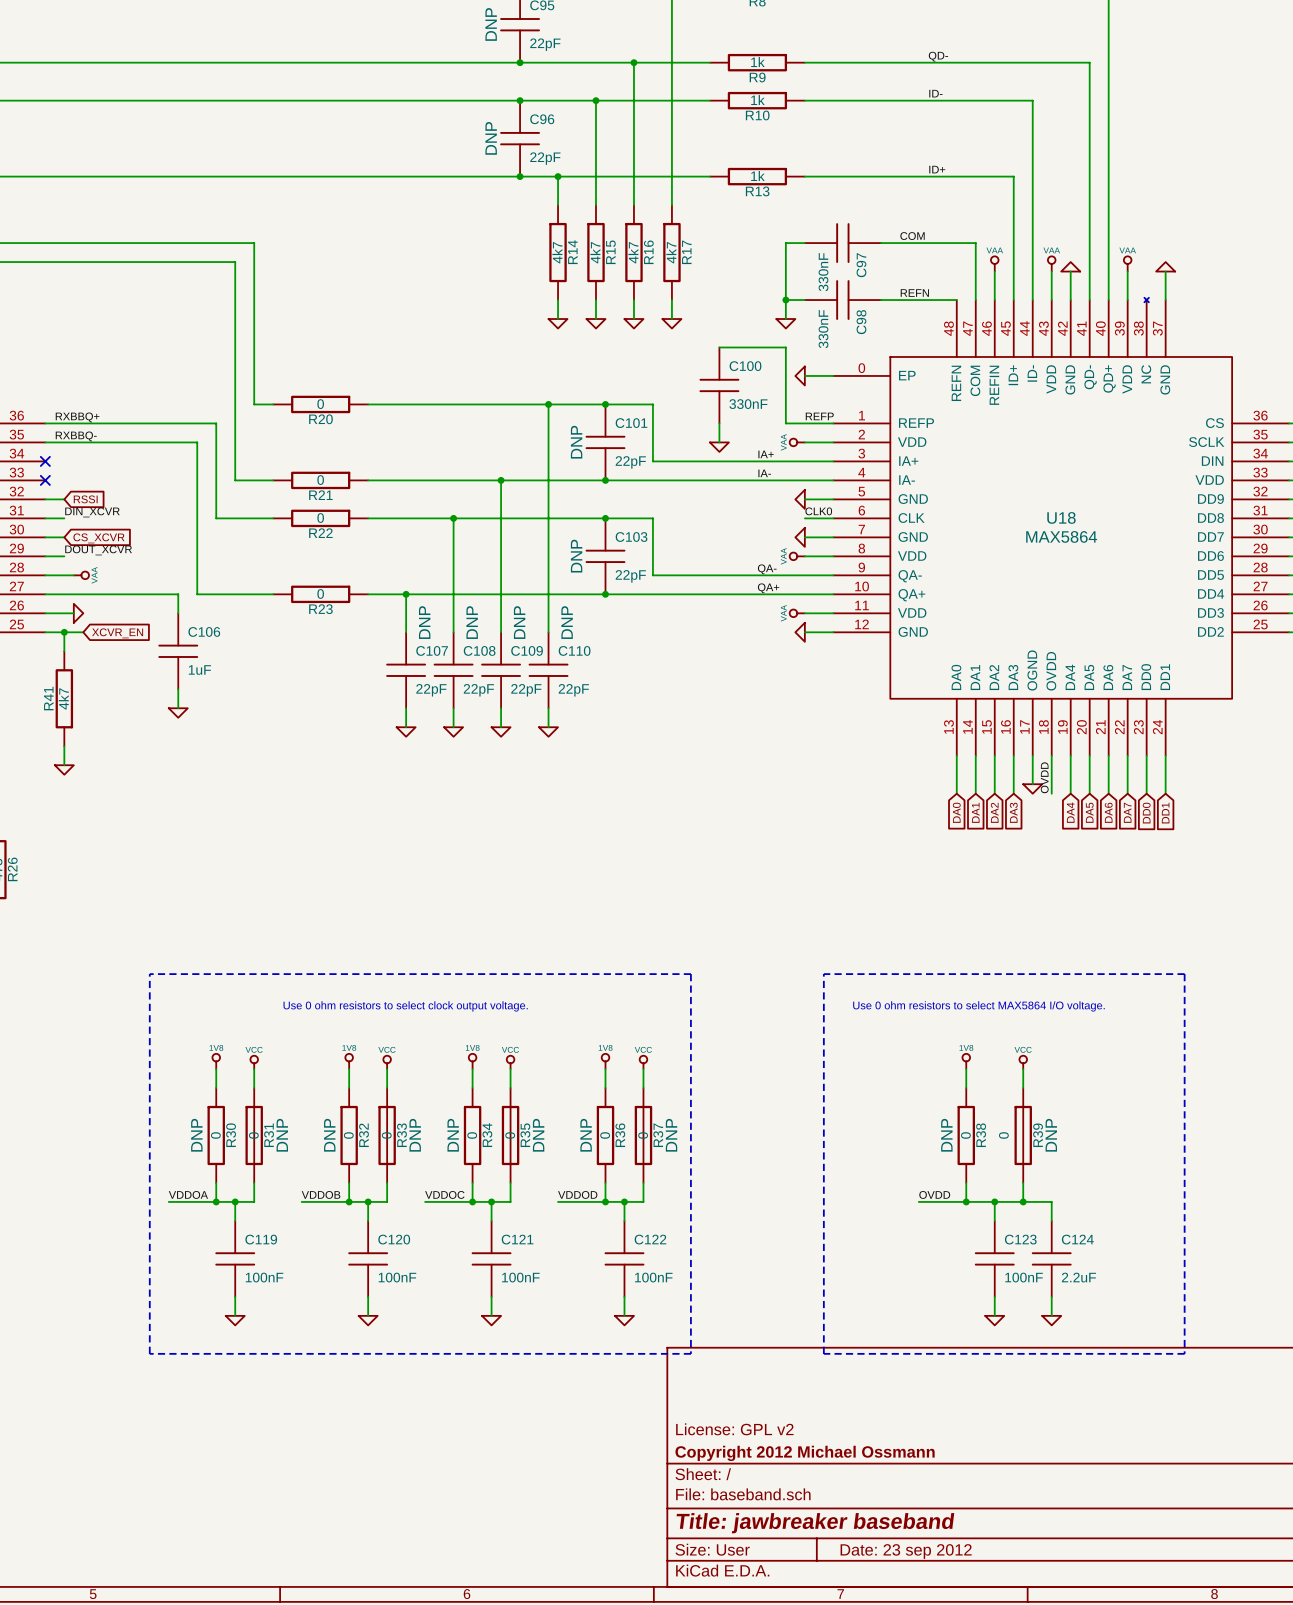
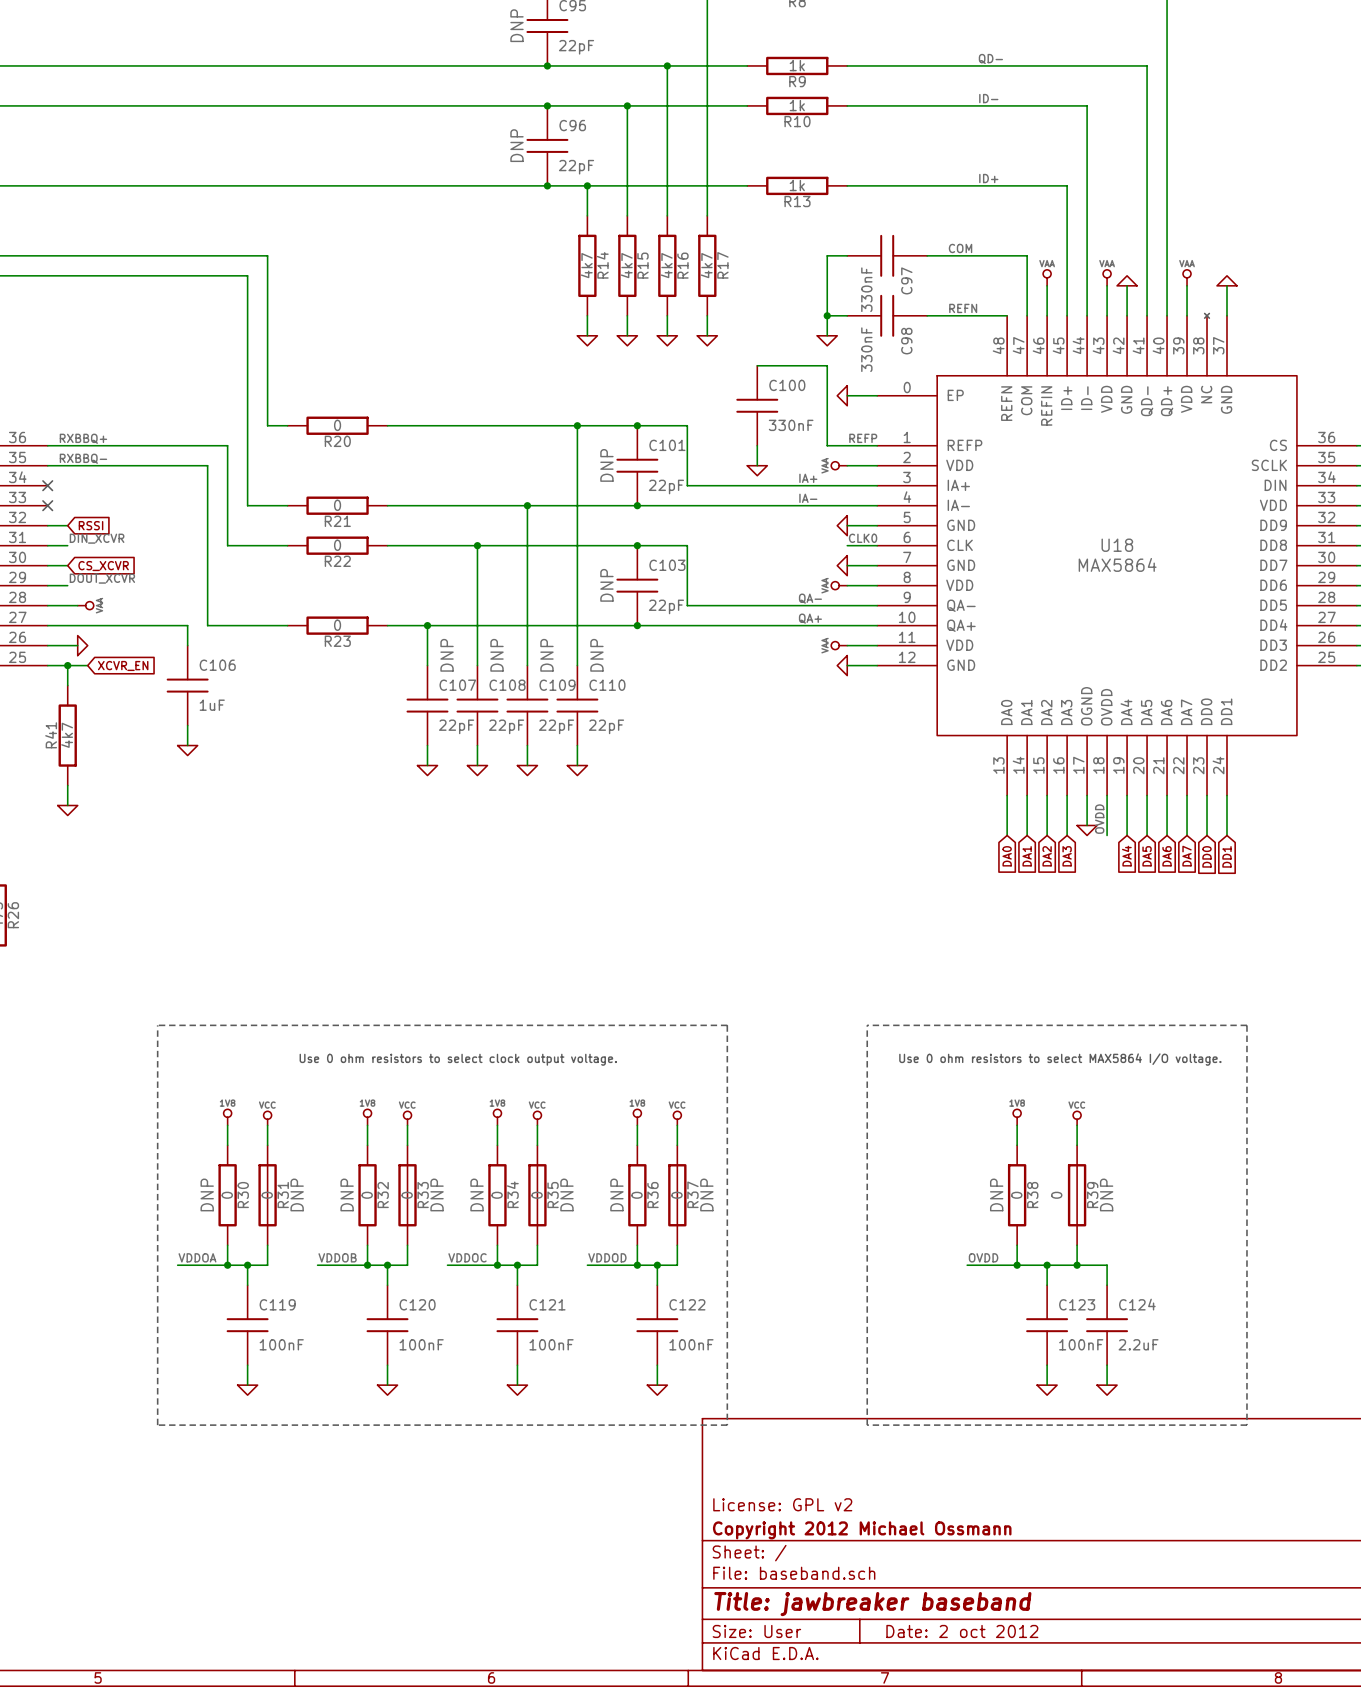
title block: Date: 23 sep 2012 (906, 1551) -> Date: 2 oct 2012 (962, 1631)

